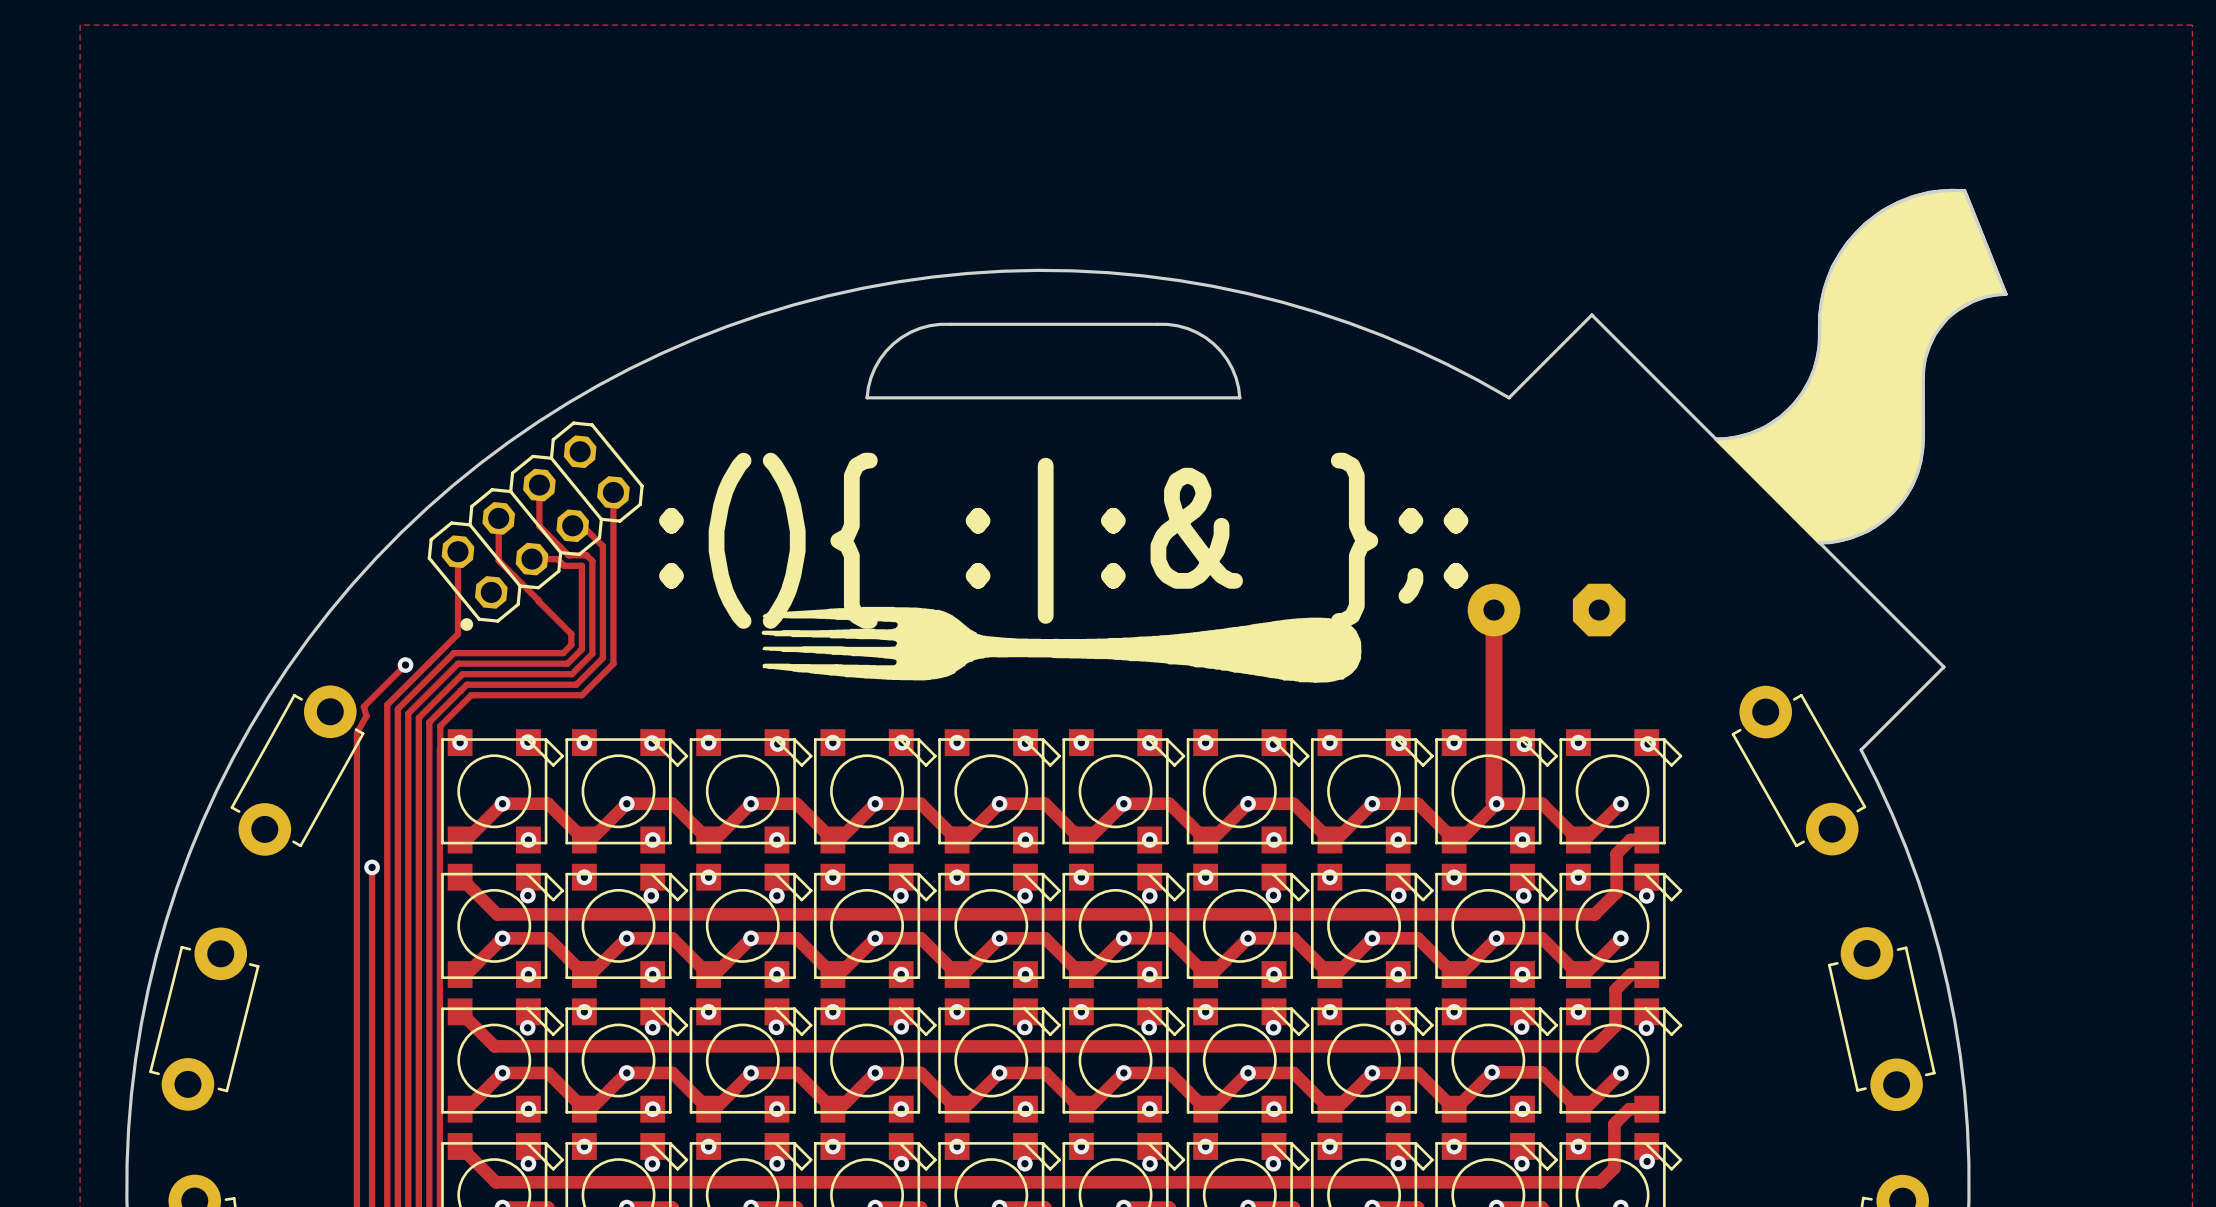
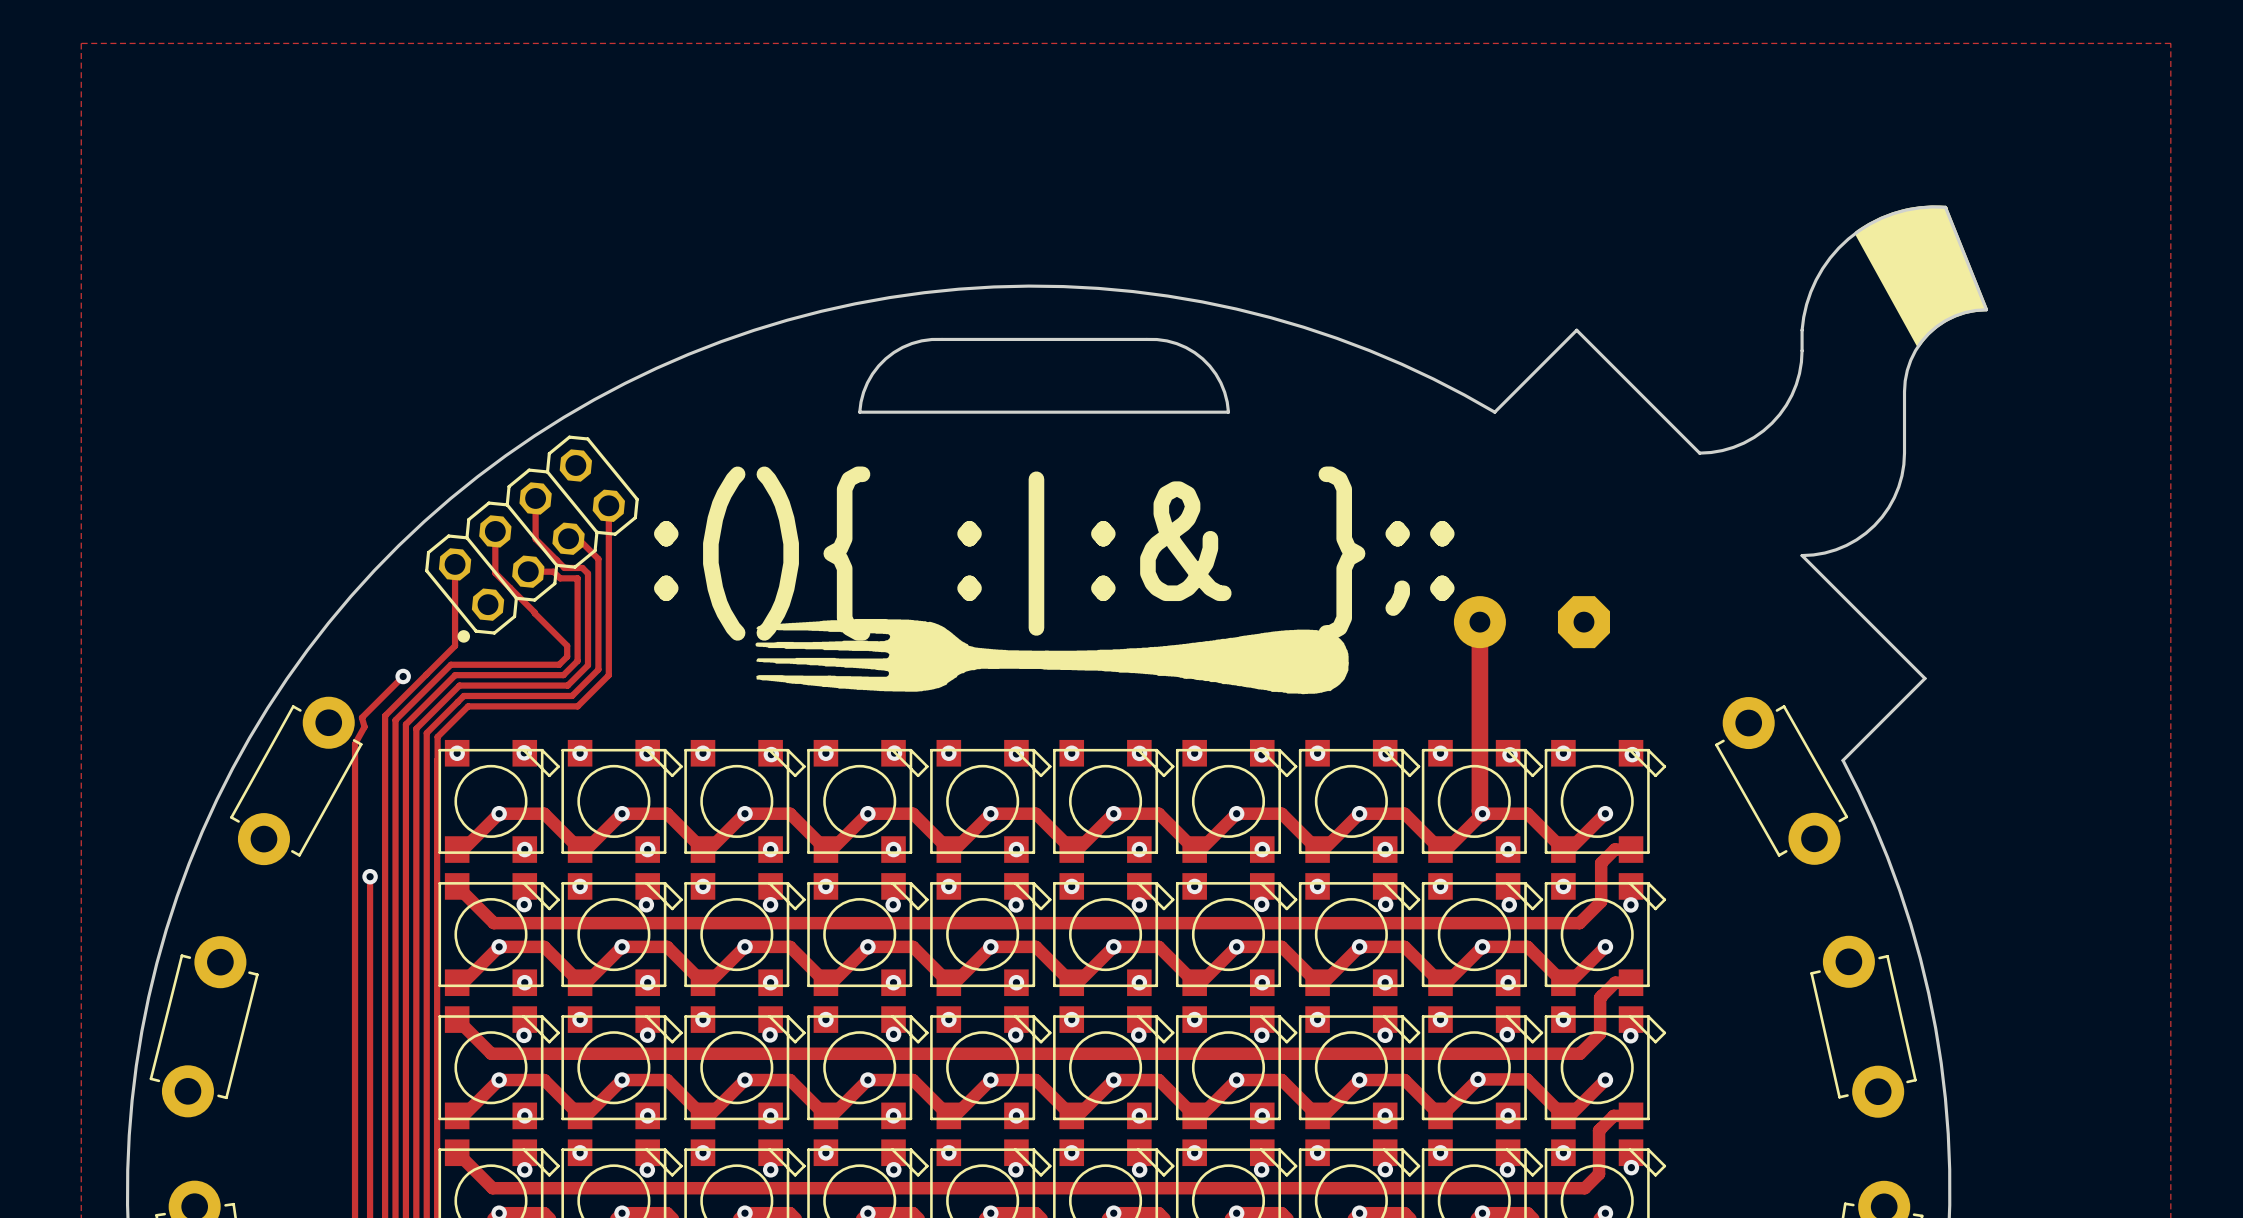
drawing: [1714, 188, 2008, 545] -> none
drawing: none -> [1854, 205, 1989, 348]

